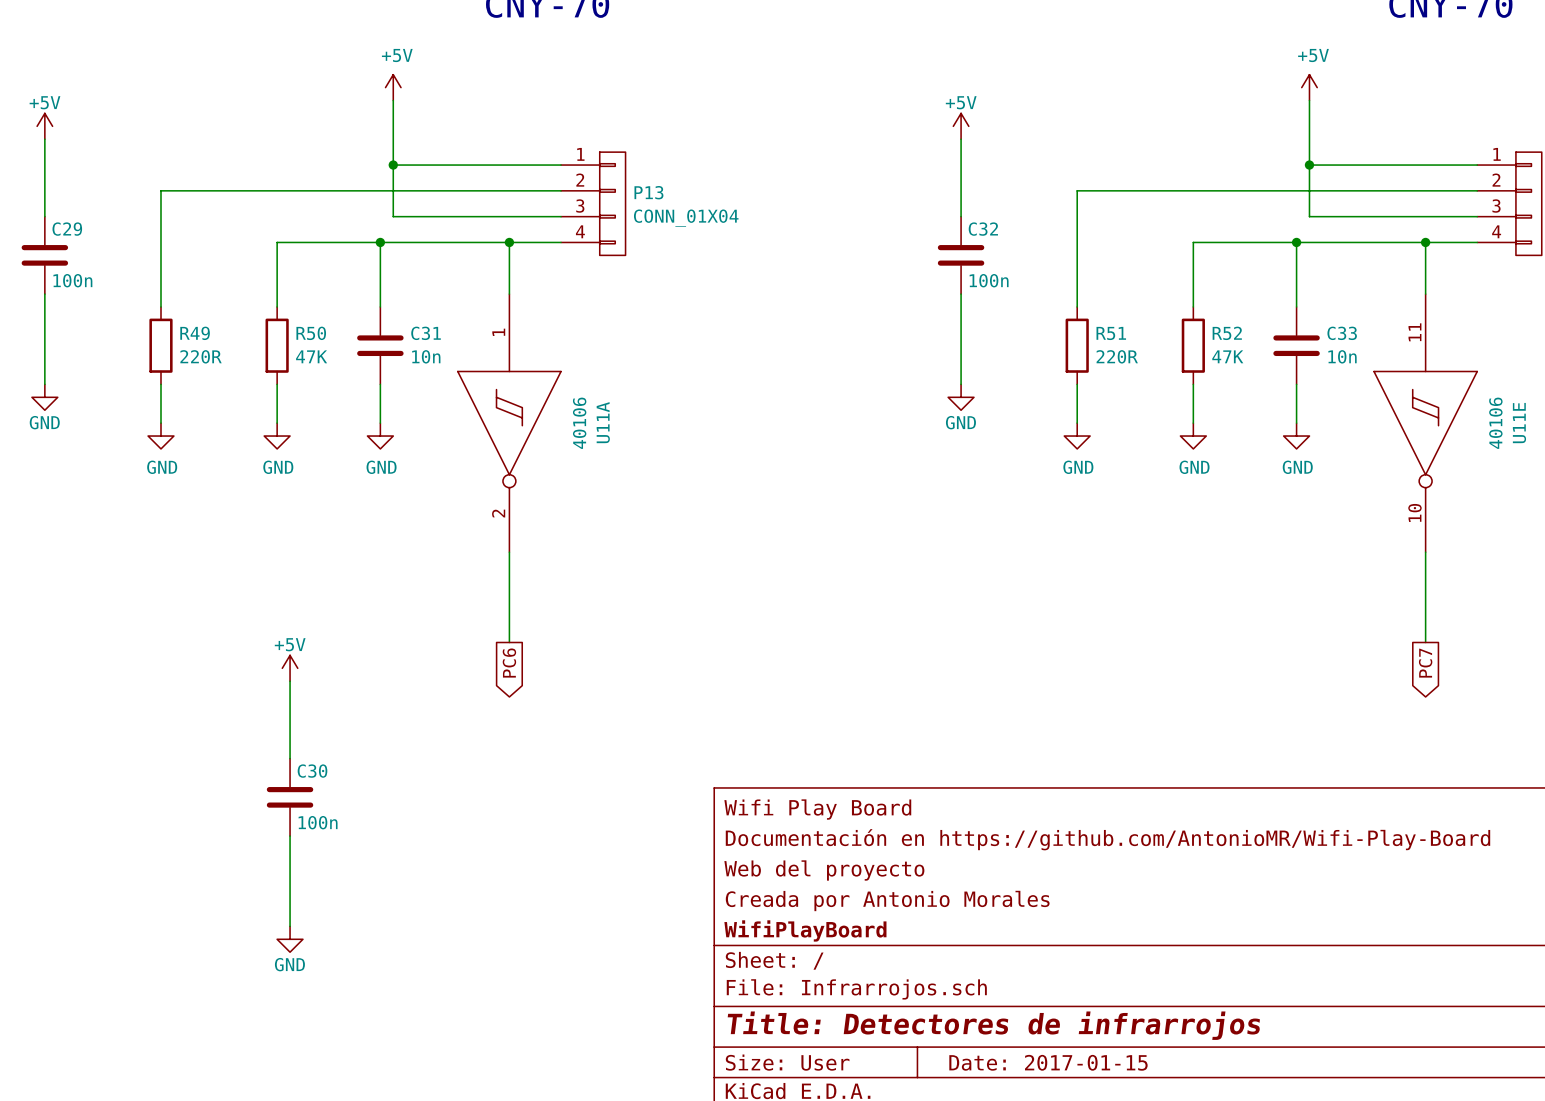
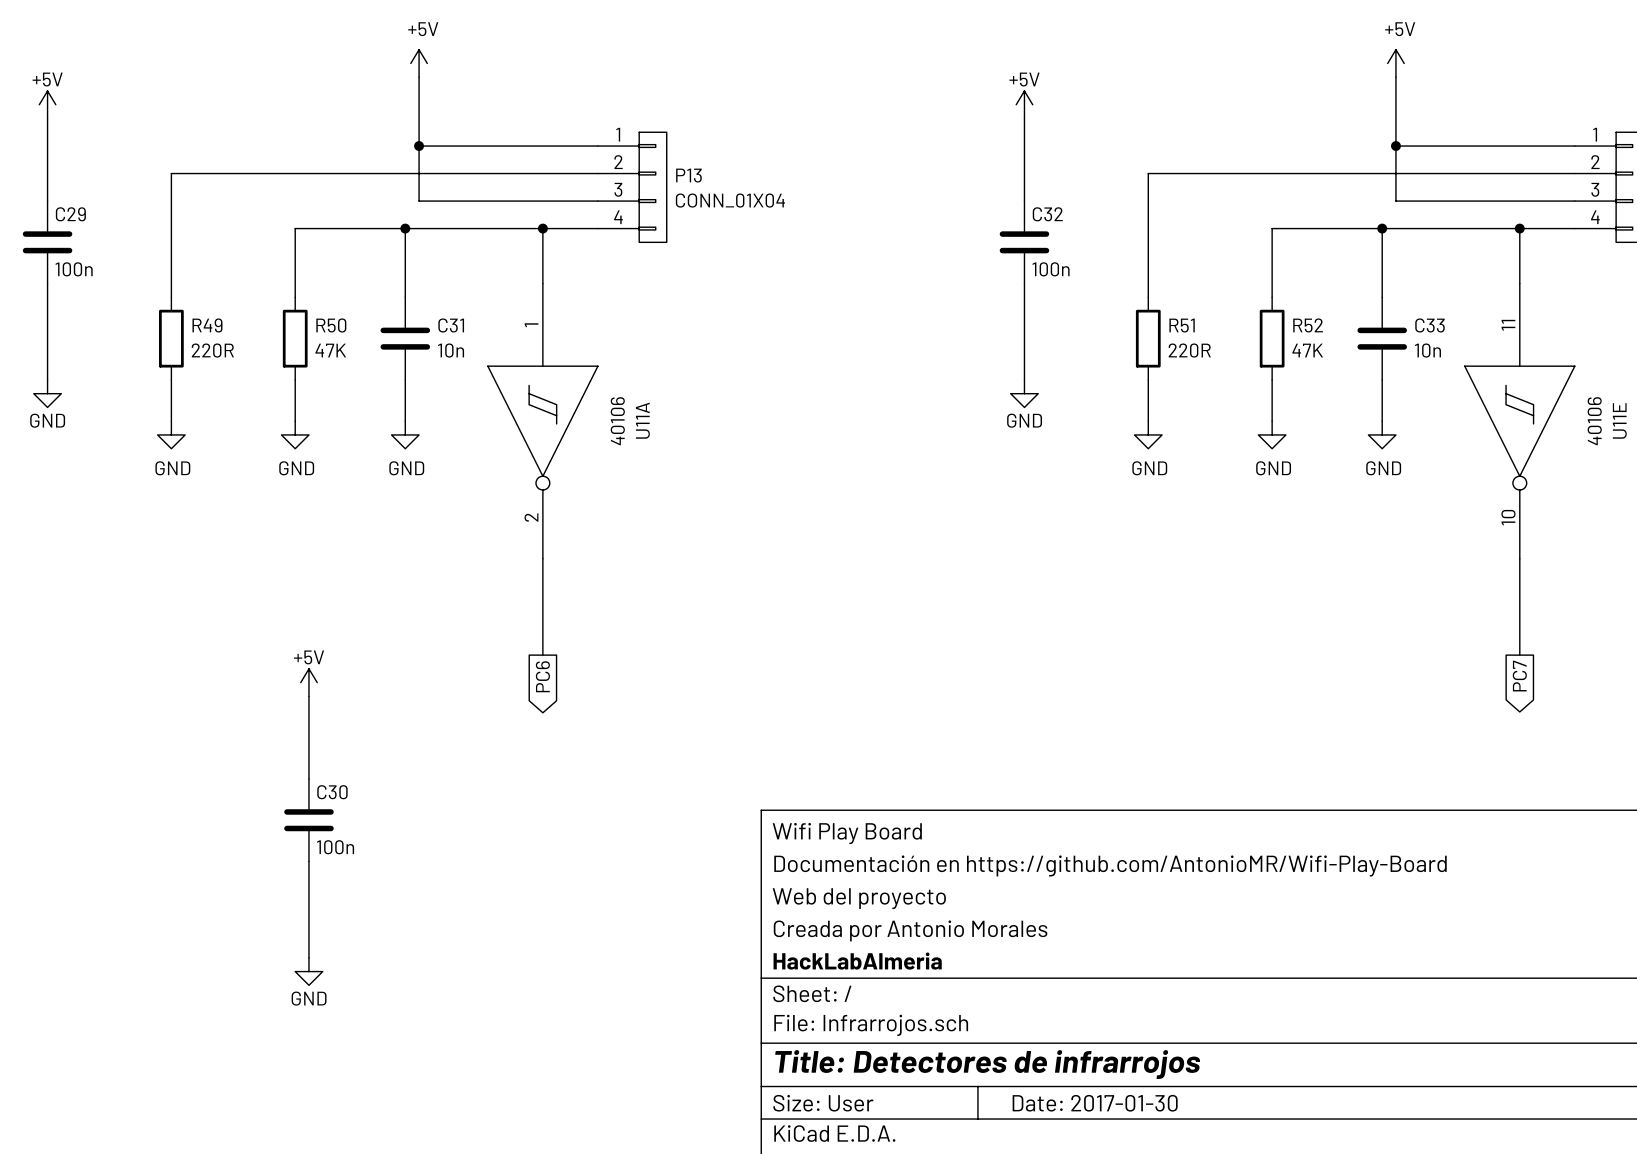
title block: WifiPlayBoard (805, 930) -> HackLabAlmeria (857, 961)
title block: Date: 2017-01-15 (1048, 1062) -> Date: 2017-01-30 (1095, 1103)

